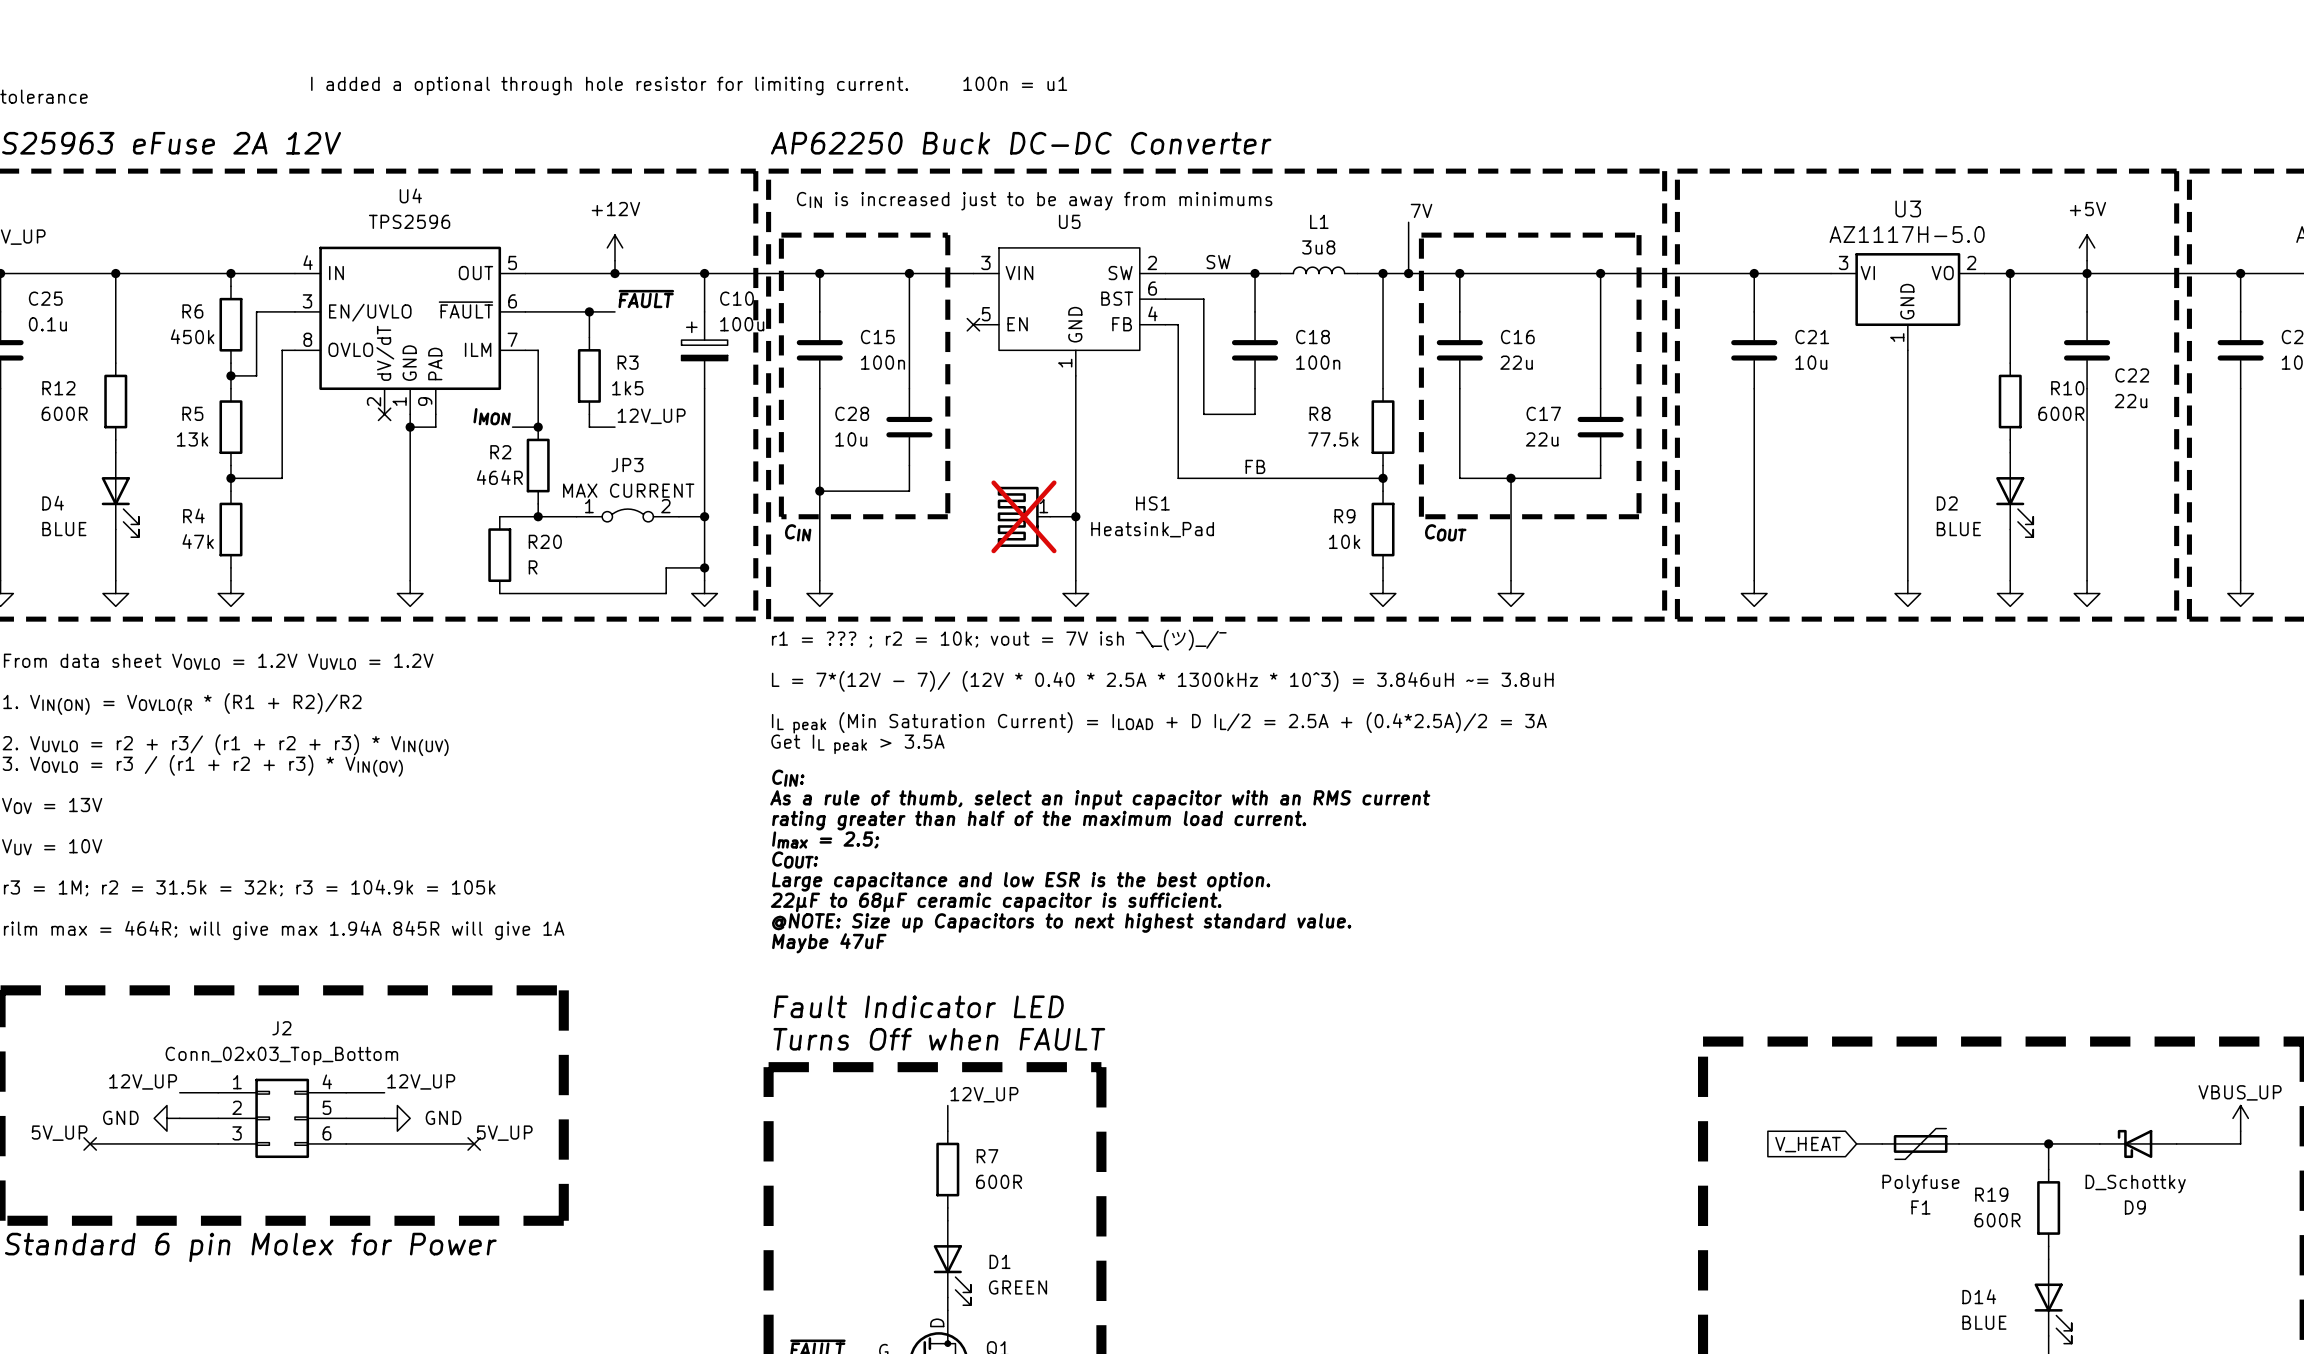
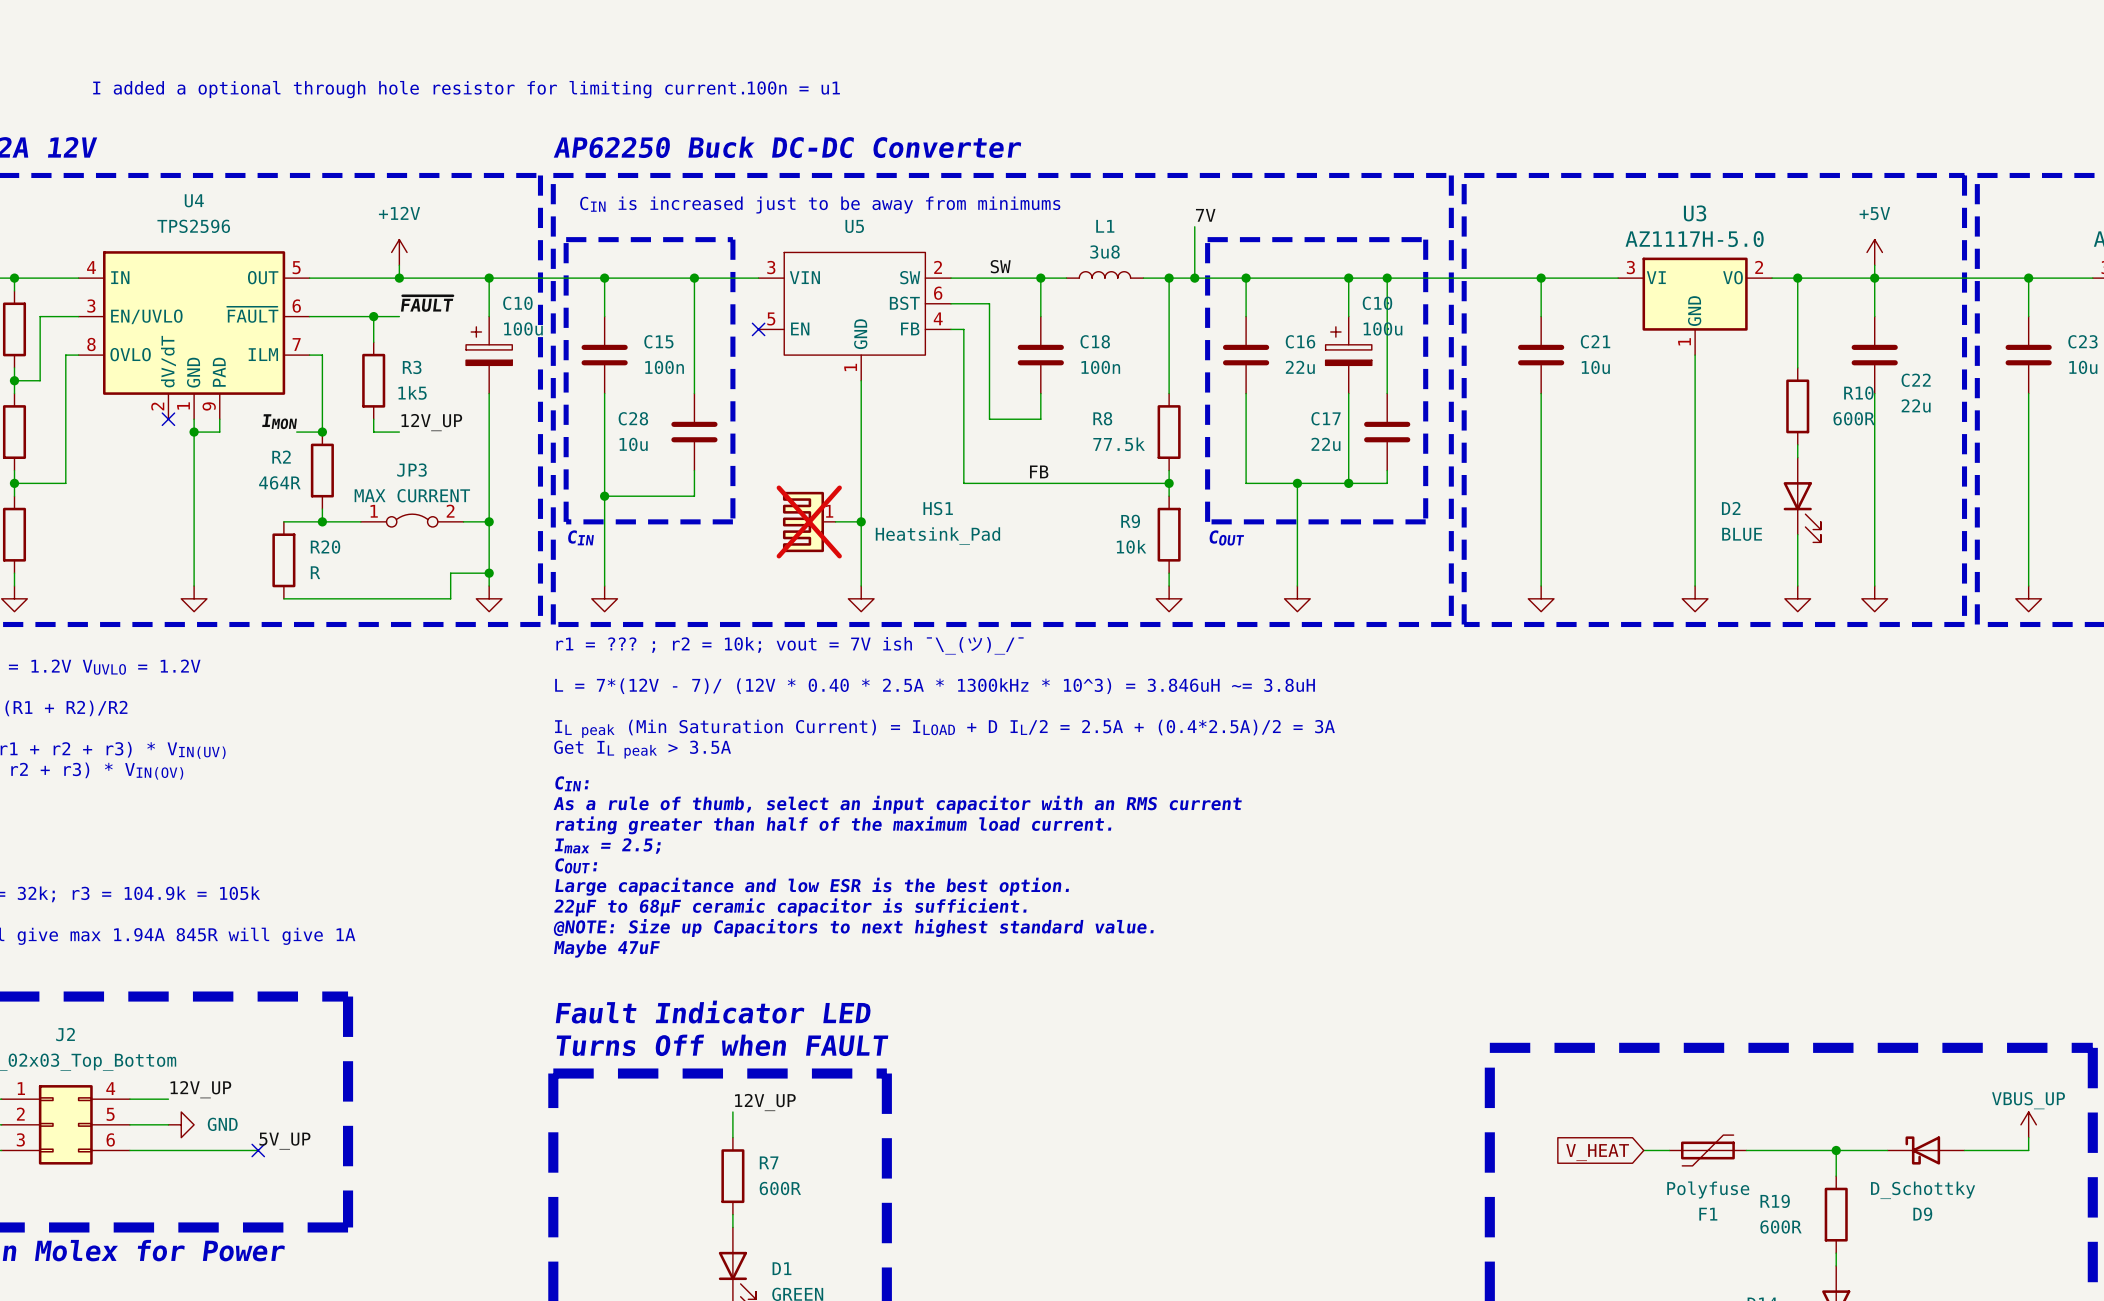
wire: none -> (1348, 278) (1348, 316)
junction: none -> (1348, 278)
C10: none -> 100u (1348, 355)
wire: none -> (1348, 393) (1348, 483)
junction: none -> (1348, 483)

